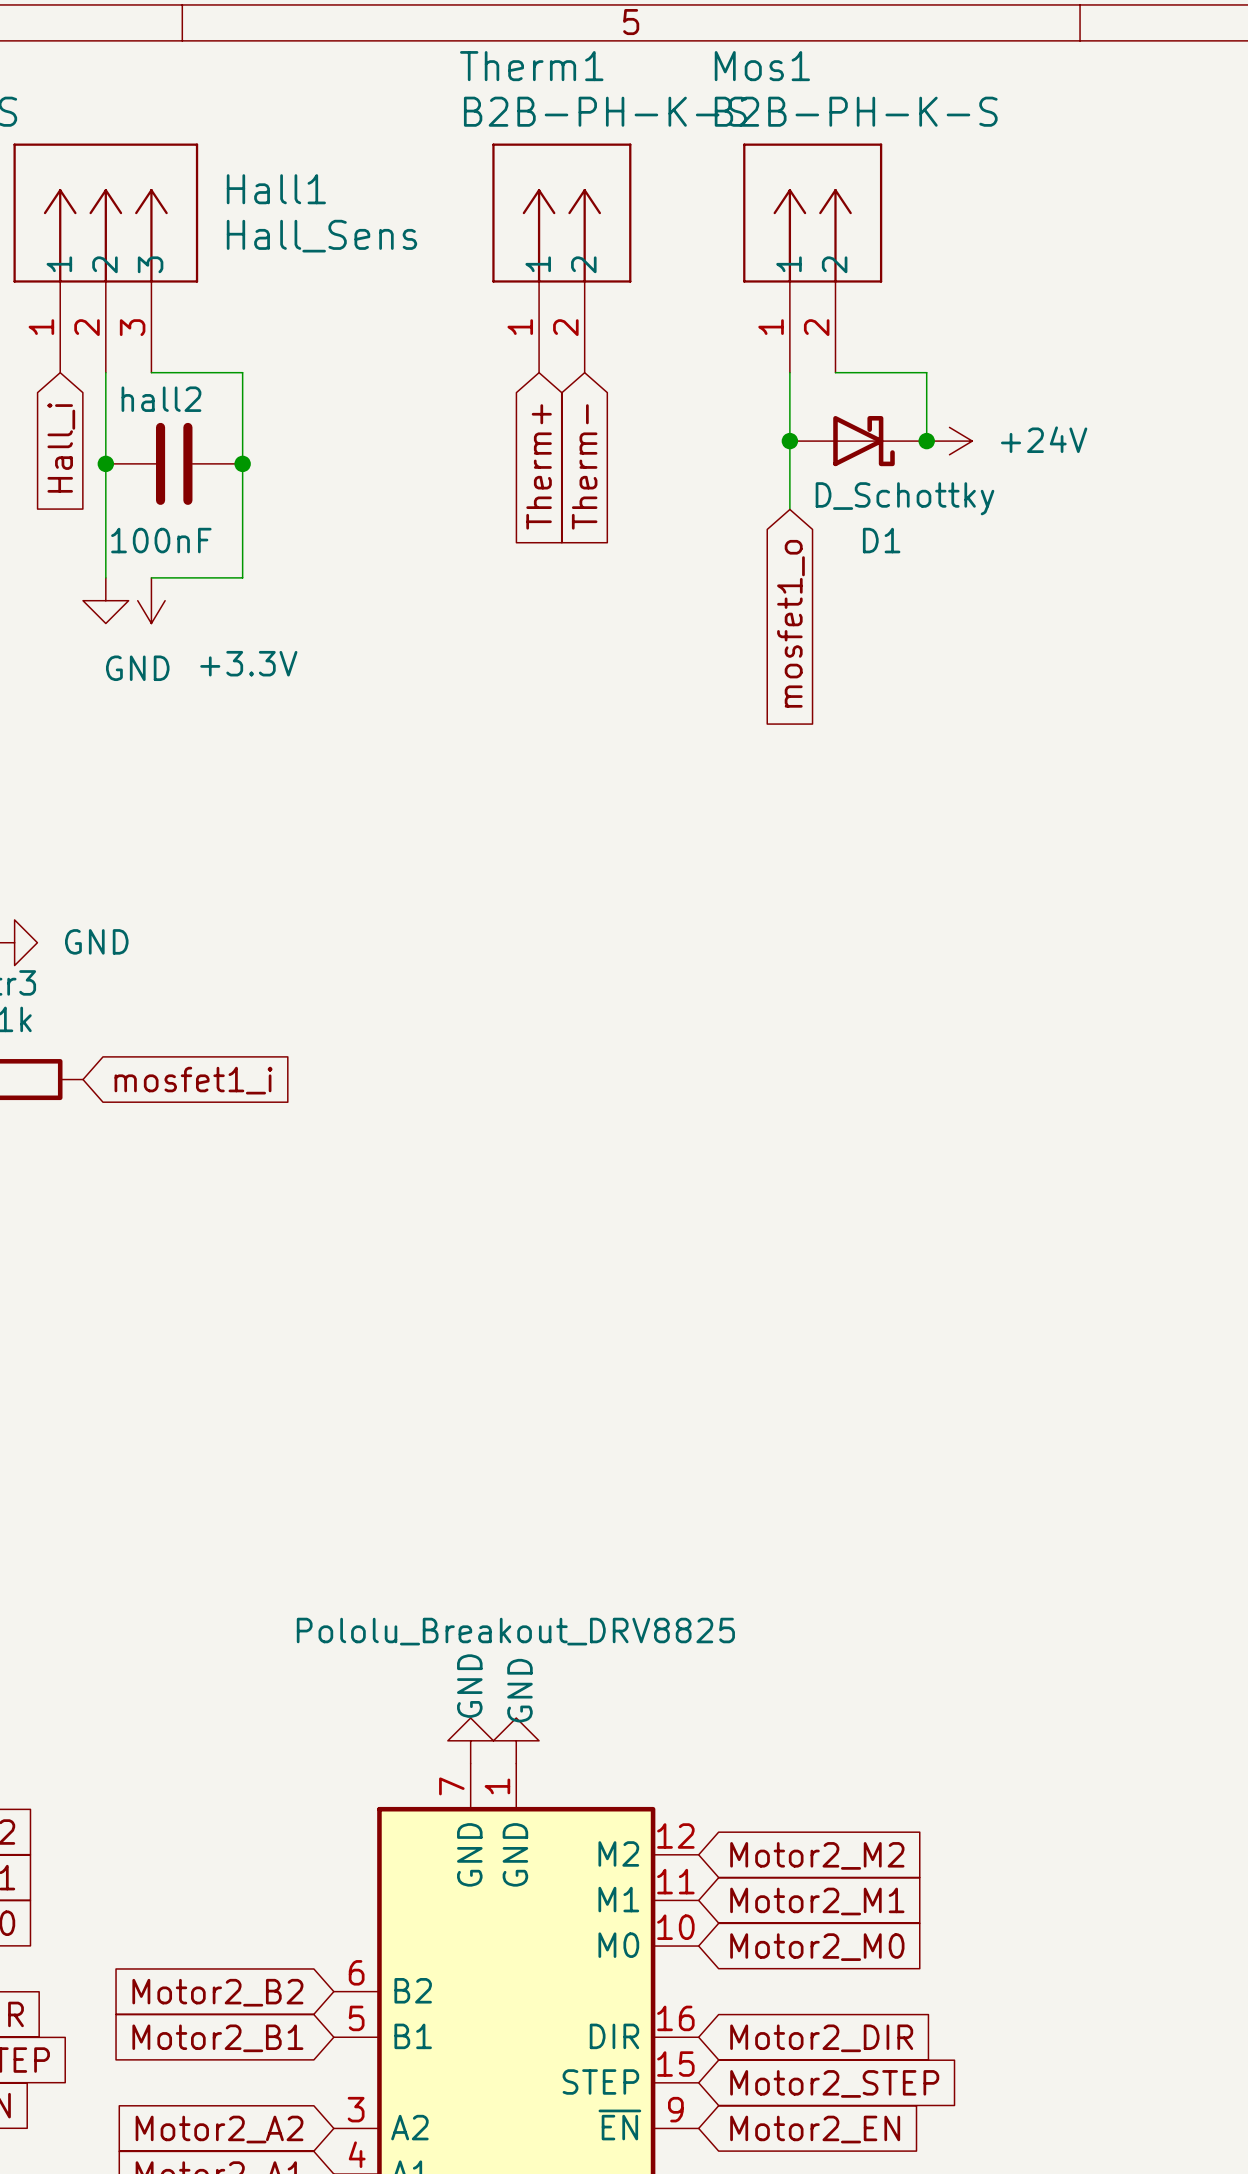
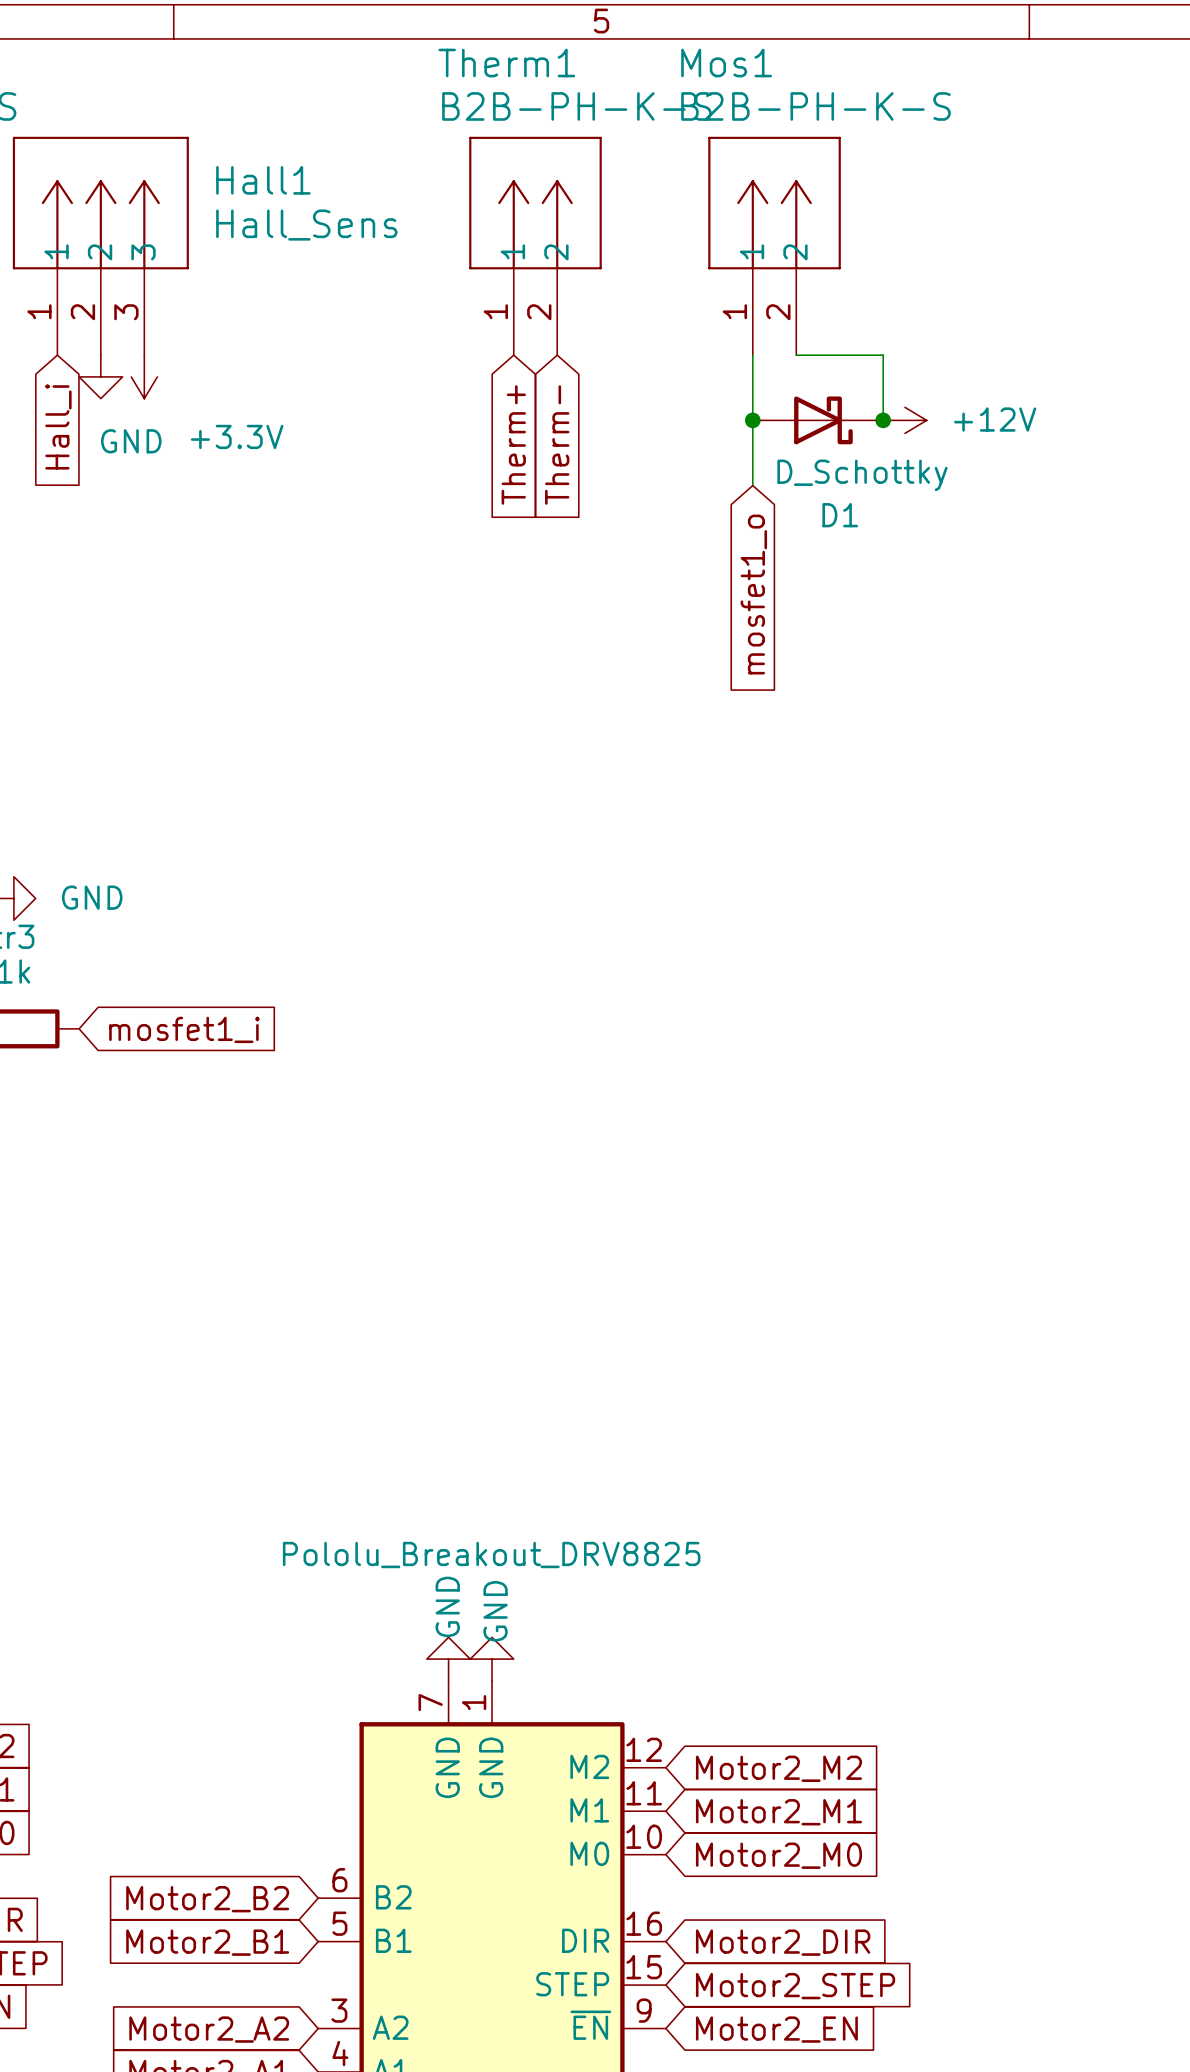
wire: (105, 372) (105, 577) -> none
wire: (151, 372) (242, 372) (242, 577) (151, 577) -> none
power symbol: +24V (949, 441) -> +12V (904, 420)
junction: (105, 463) -> none
hall2: 100nF (174, 463) -> none
junction: (242, 463) -> none
power symbol position: GND (105, 600) -> GND (100, 376)
power symbol position: +3.3V (151, 600) -> +3.3V (144, 376)

